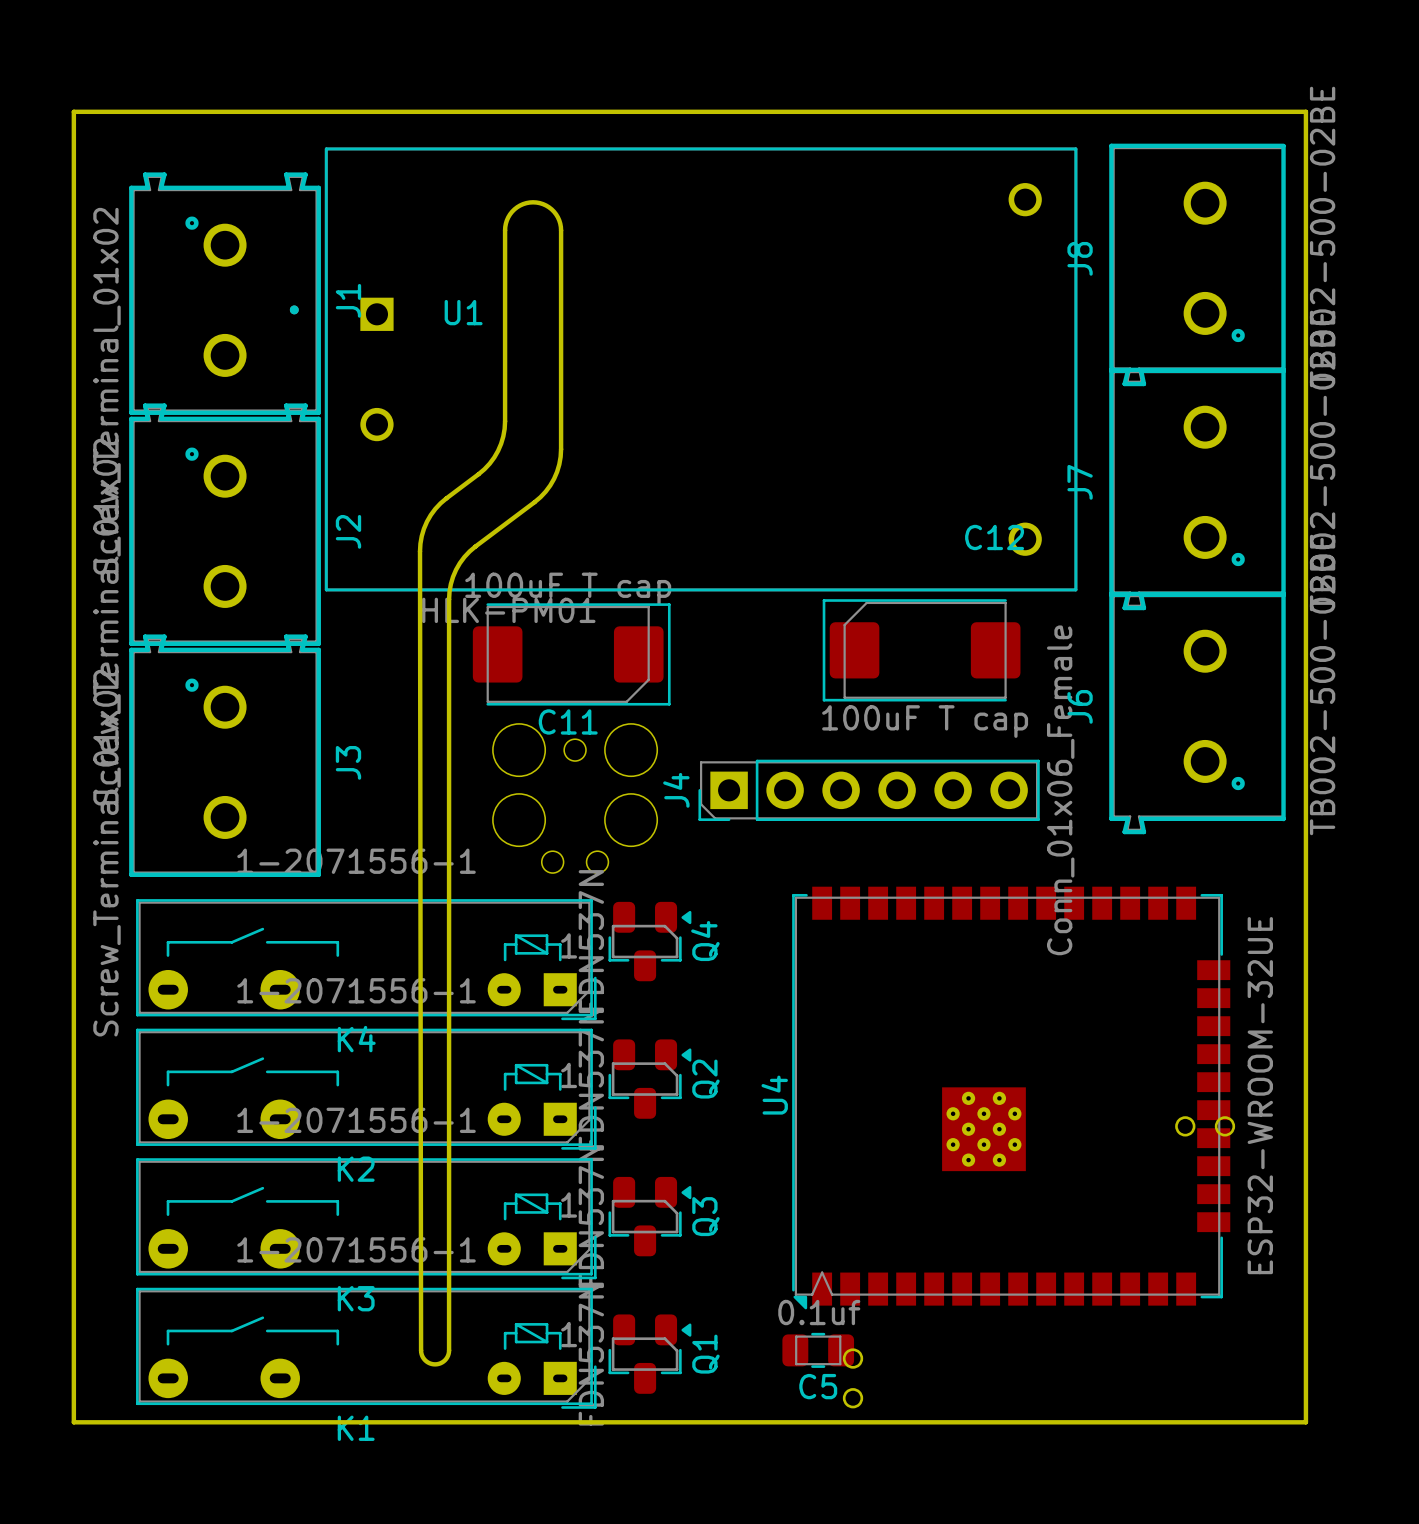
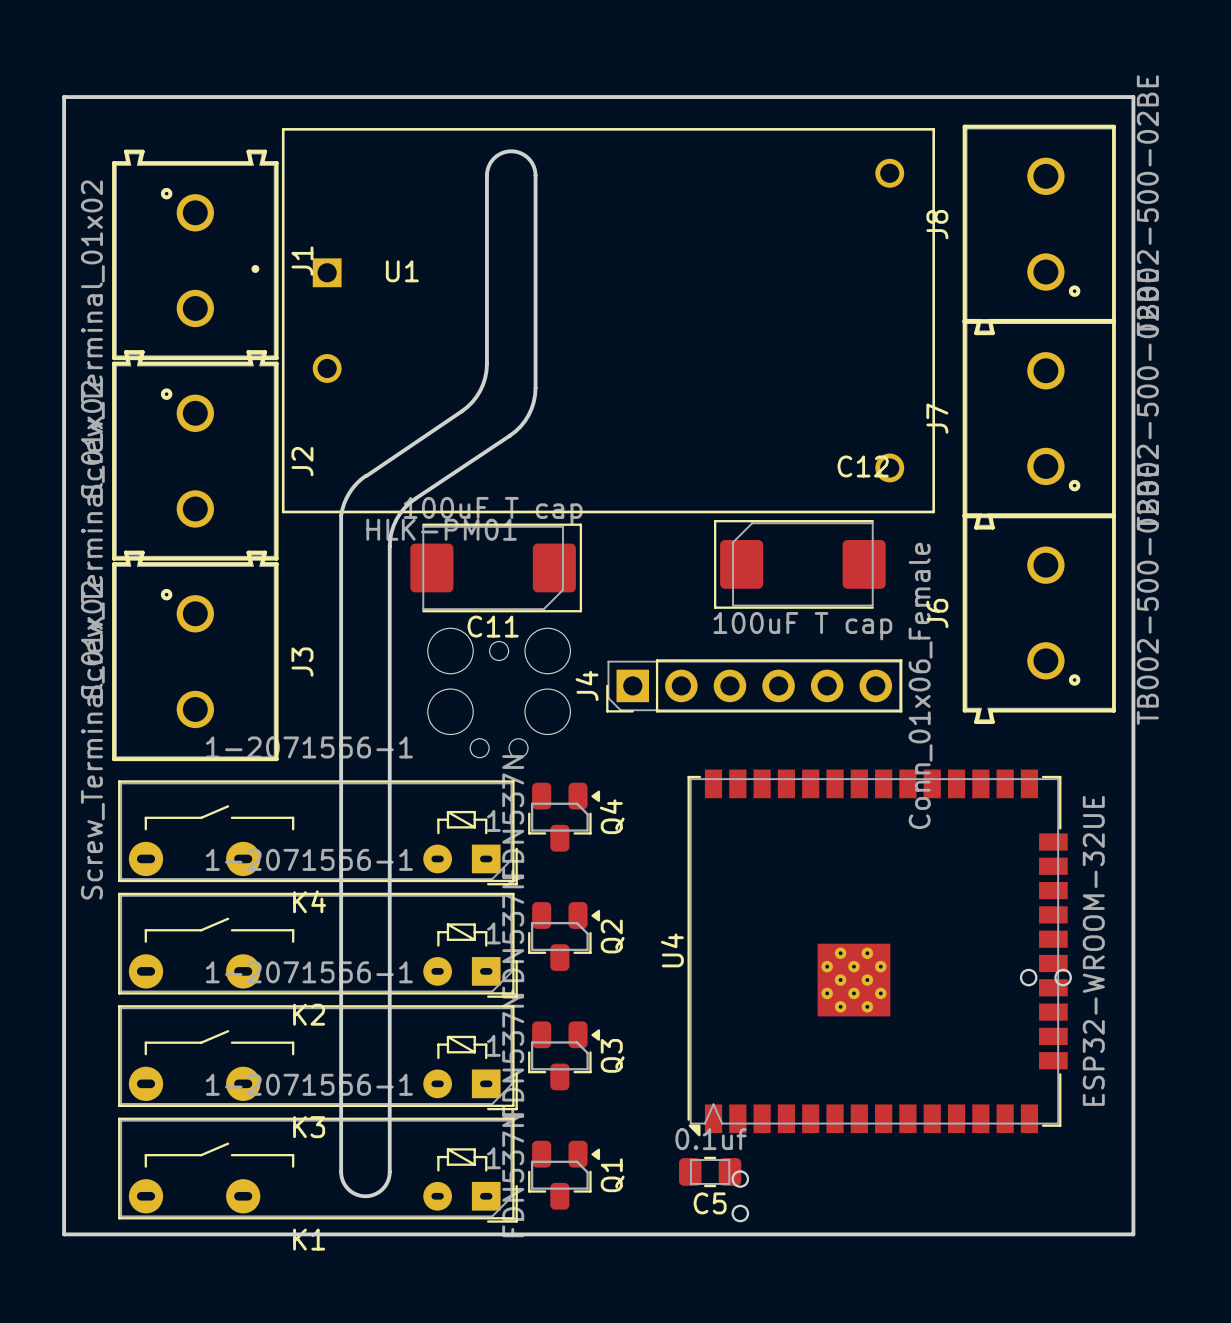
board edge: (561, 230) (559, 220) (554, 211) (546, 205) (536, 202) (526, 203) (517, 207) (506, 220) (505, 230) (505, 421) (503, 436) (494, 457) (484, 469) (435, 508) (426, 521) (420, 543) (421, 1350) (425, 1360) (435, 1364) (444, 1360) (449, 1350) -> (366, 475) (349, 493) (341, 515) (341, 1171) (343, 1183) (349, 1190) (356, 1194) (365, 1196) (374, 1194) (383, 1188) (388, 1180) (389, 1171)
board edge: none -> (486, 199) (487, 172) (494, 158) (501, 153) (511, 151) (520, 153) (528, 158) (533, 166) (535, 175) (535, 387) (533, 401) (525, 420) (515, 431) (415, 498) (404, 507) (393, 525) (389, 546)
board edge: (561, 419) (560, 456) (557, 471) (550, 485) (534, 502) (469, 551) (456, 569) (449, 591) (449, 629) -> (486, 363) (483, 384) (476, 396) (467, 407) (366, 476)

